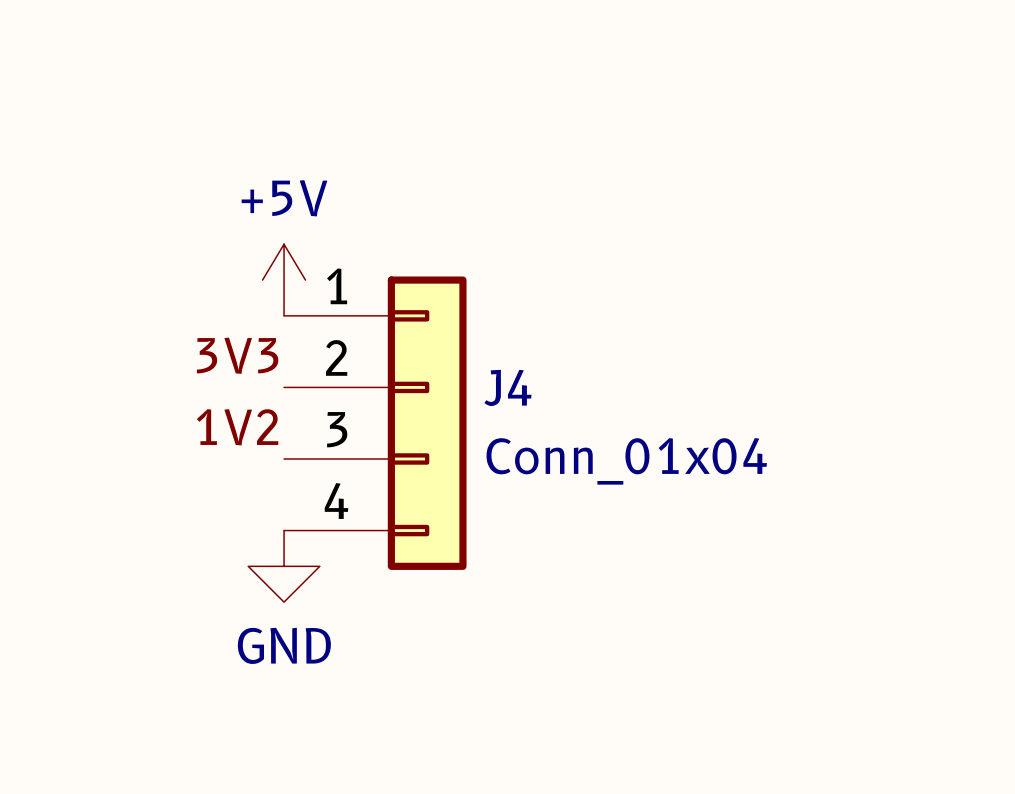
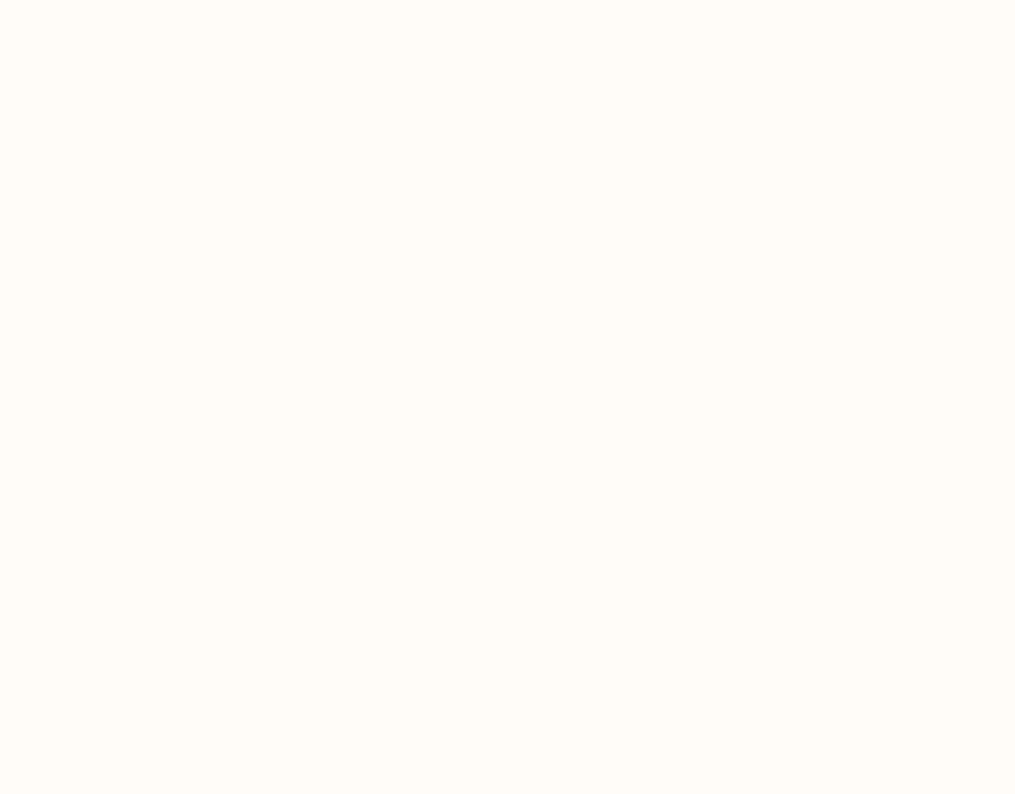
power symbol: +5V (284, 280) -> none
label: 3V3 (237, 355) -> none
J4: Conn_01x04 (375, 423) -> none
label: 1V2 (237, 427) -> none
power symbol: GND (284, 566) -> none

